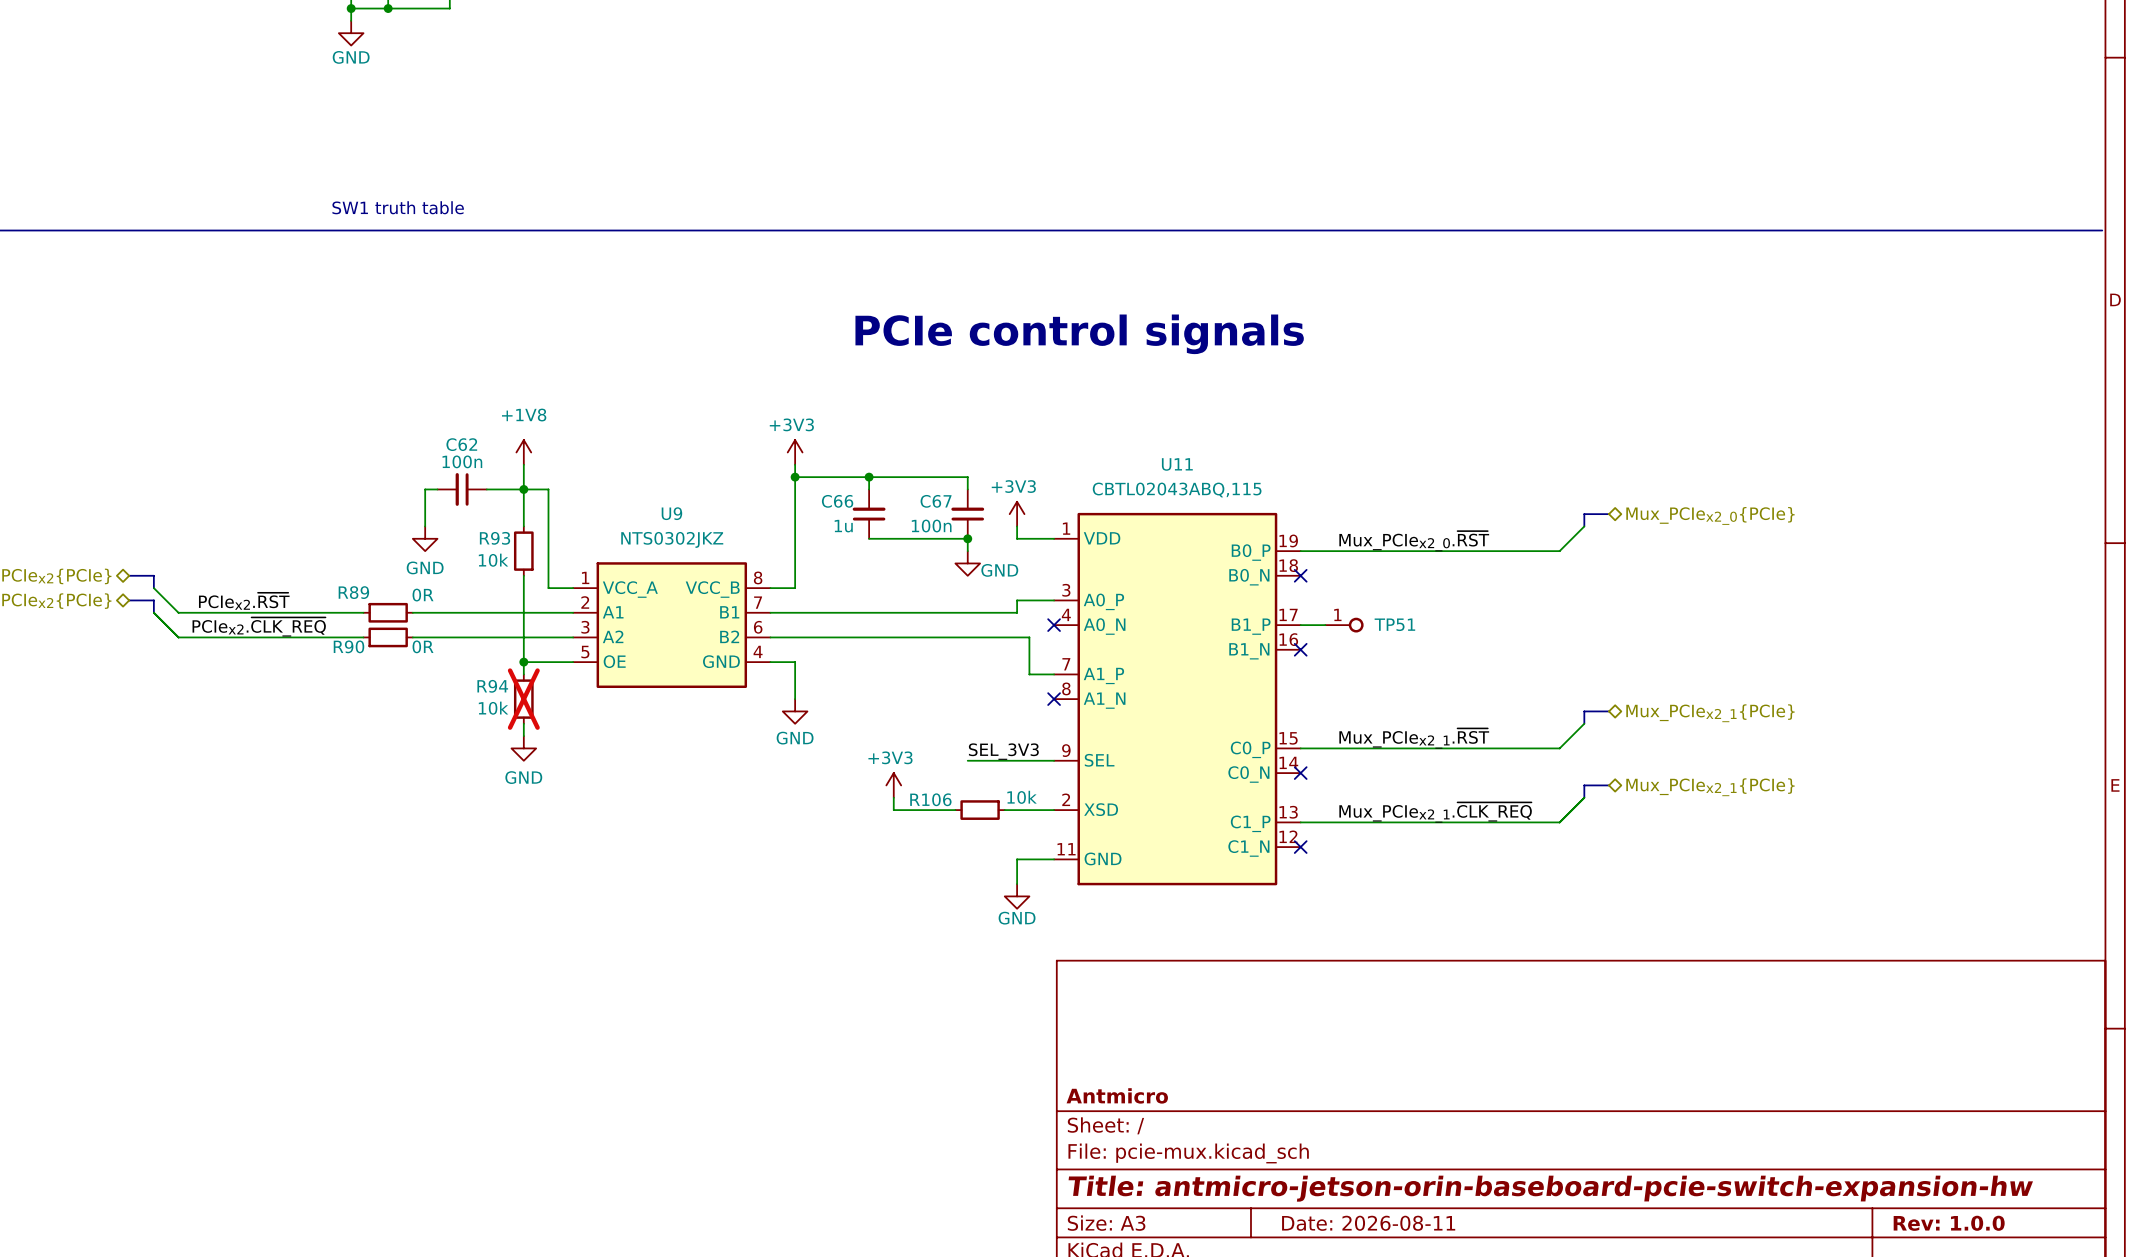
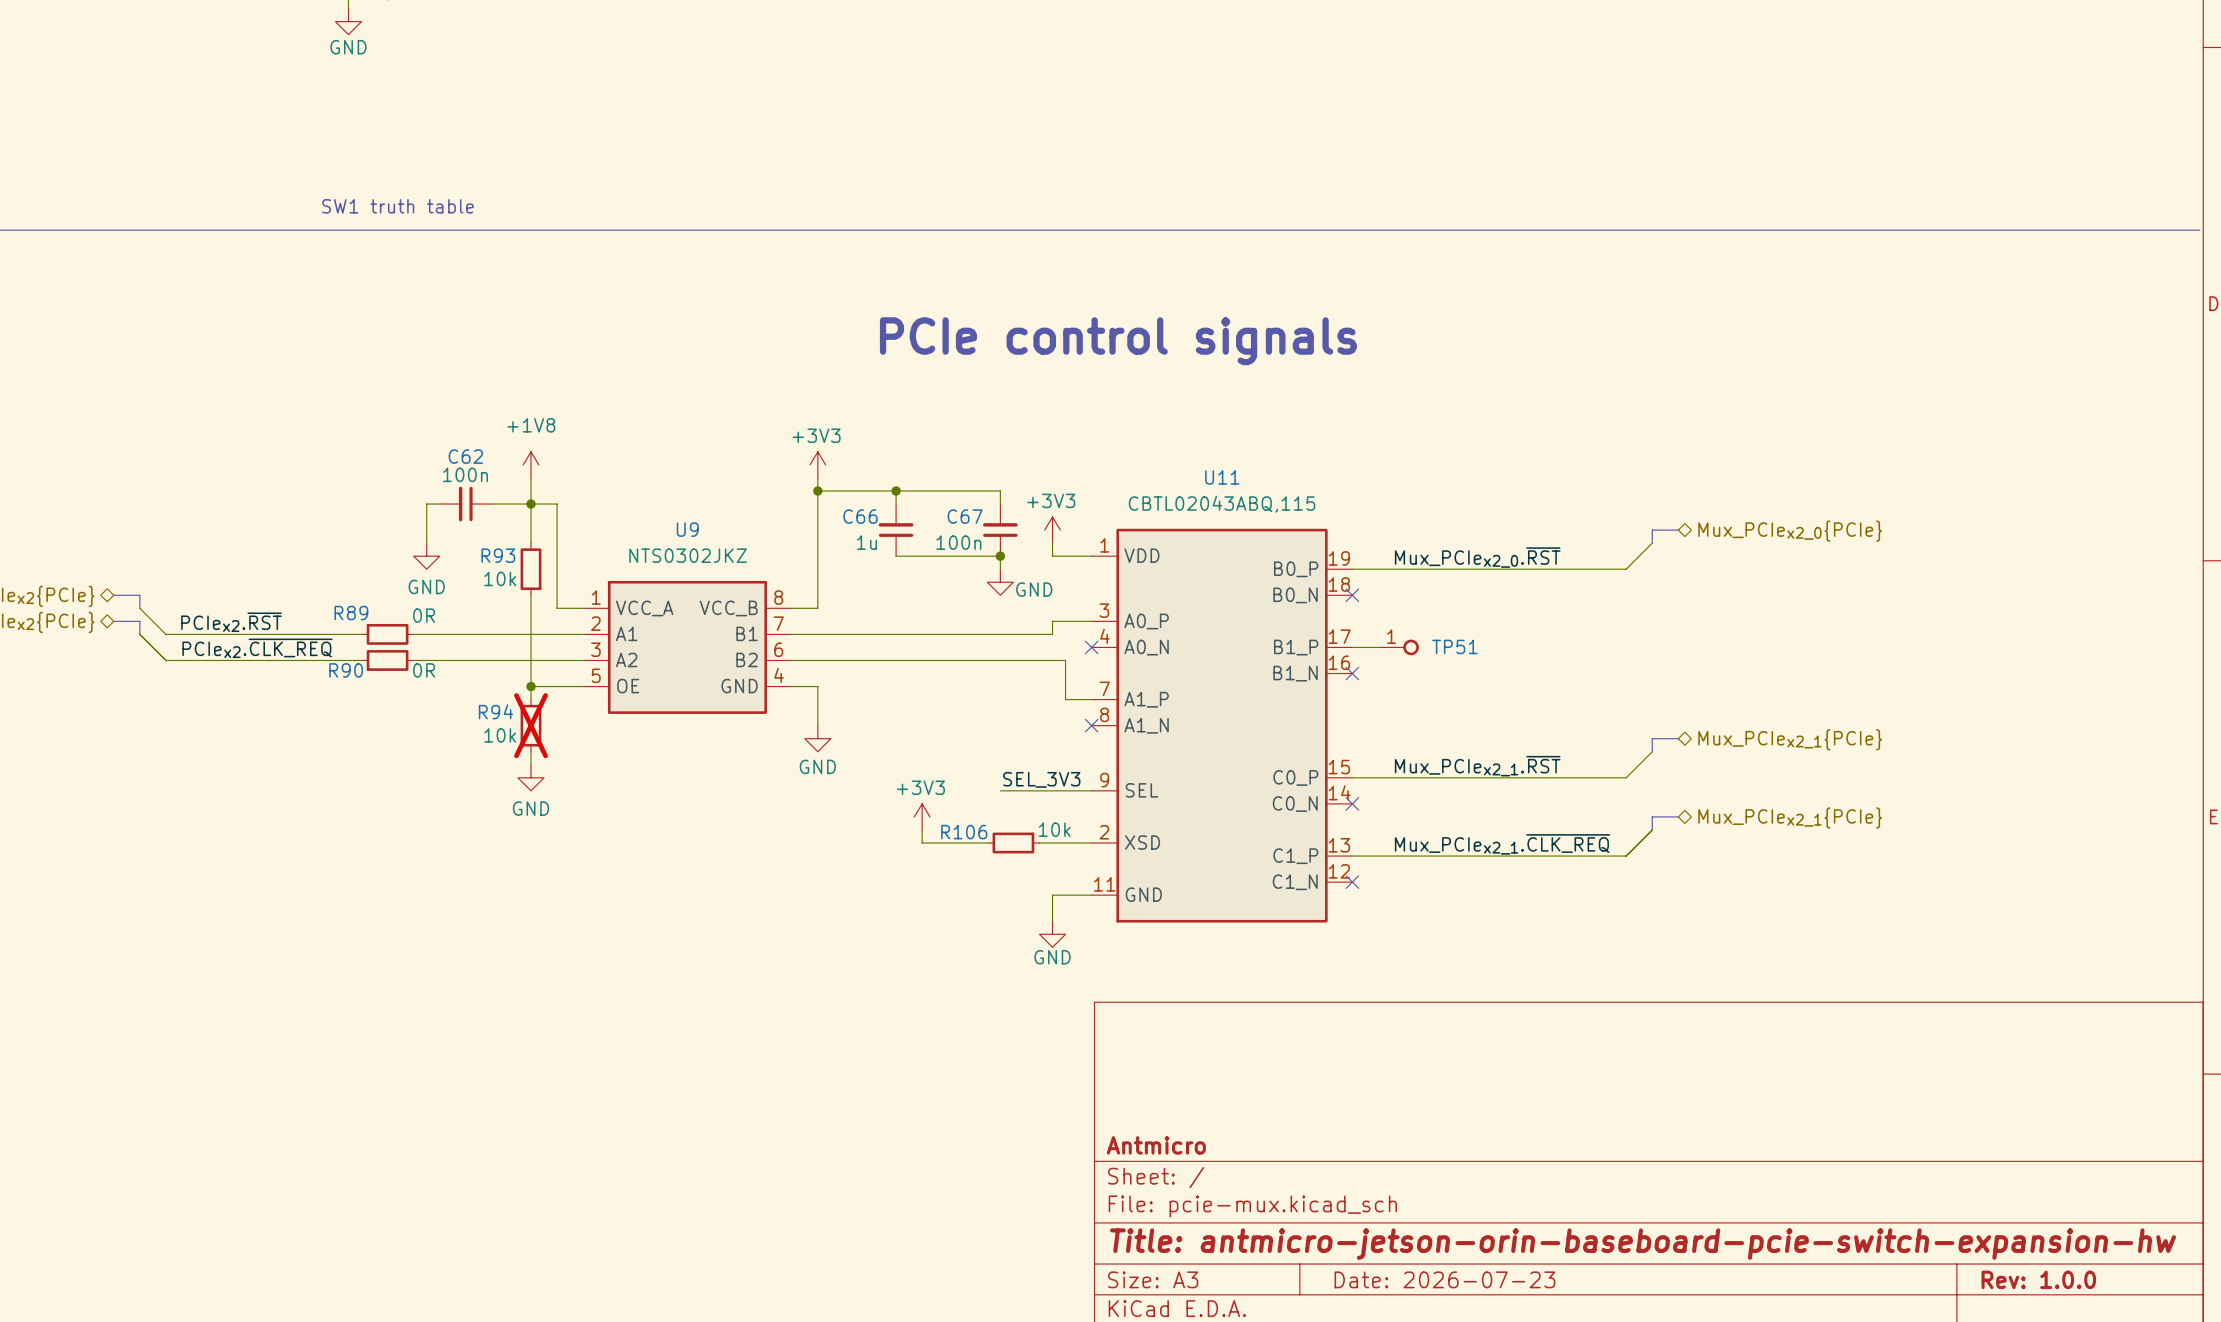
title block: Date: 2026-08-11 (1368, 1223) -> Date: 2026-07-23 (1444, 1279)

